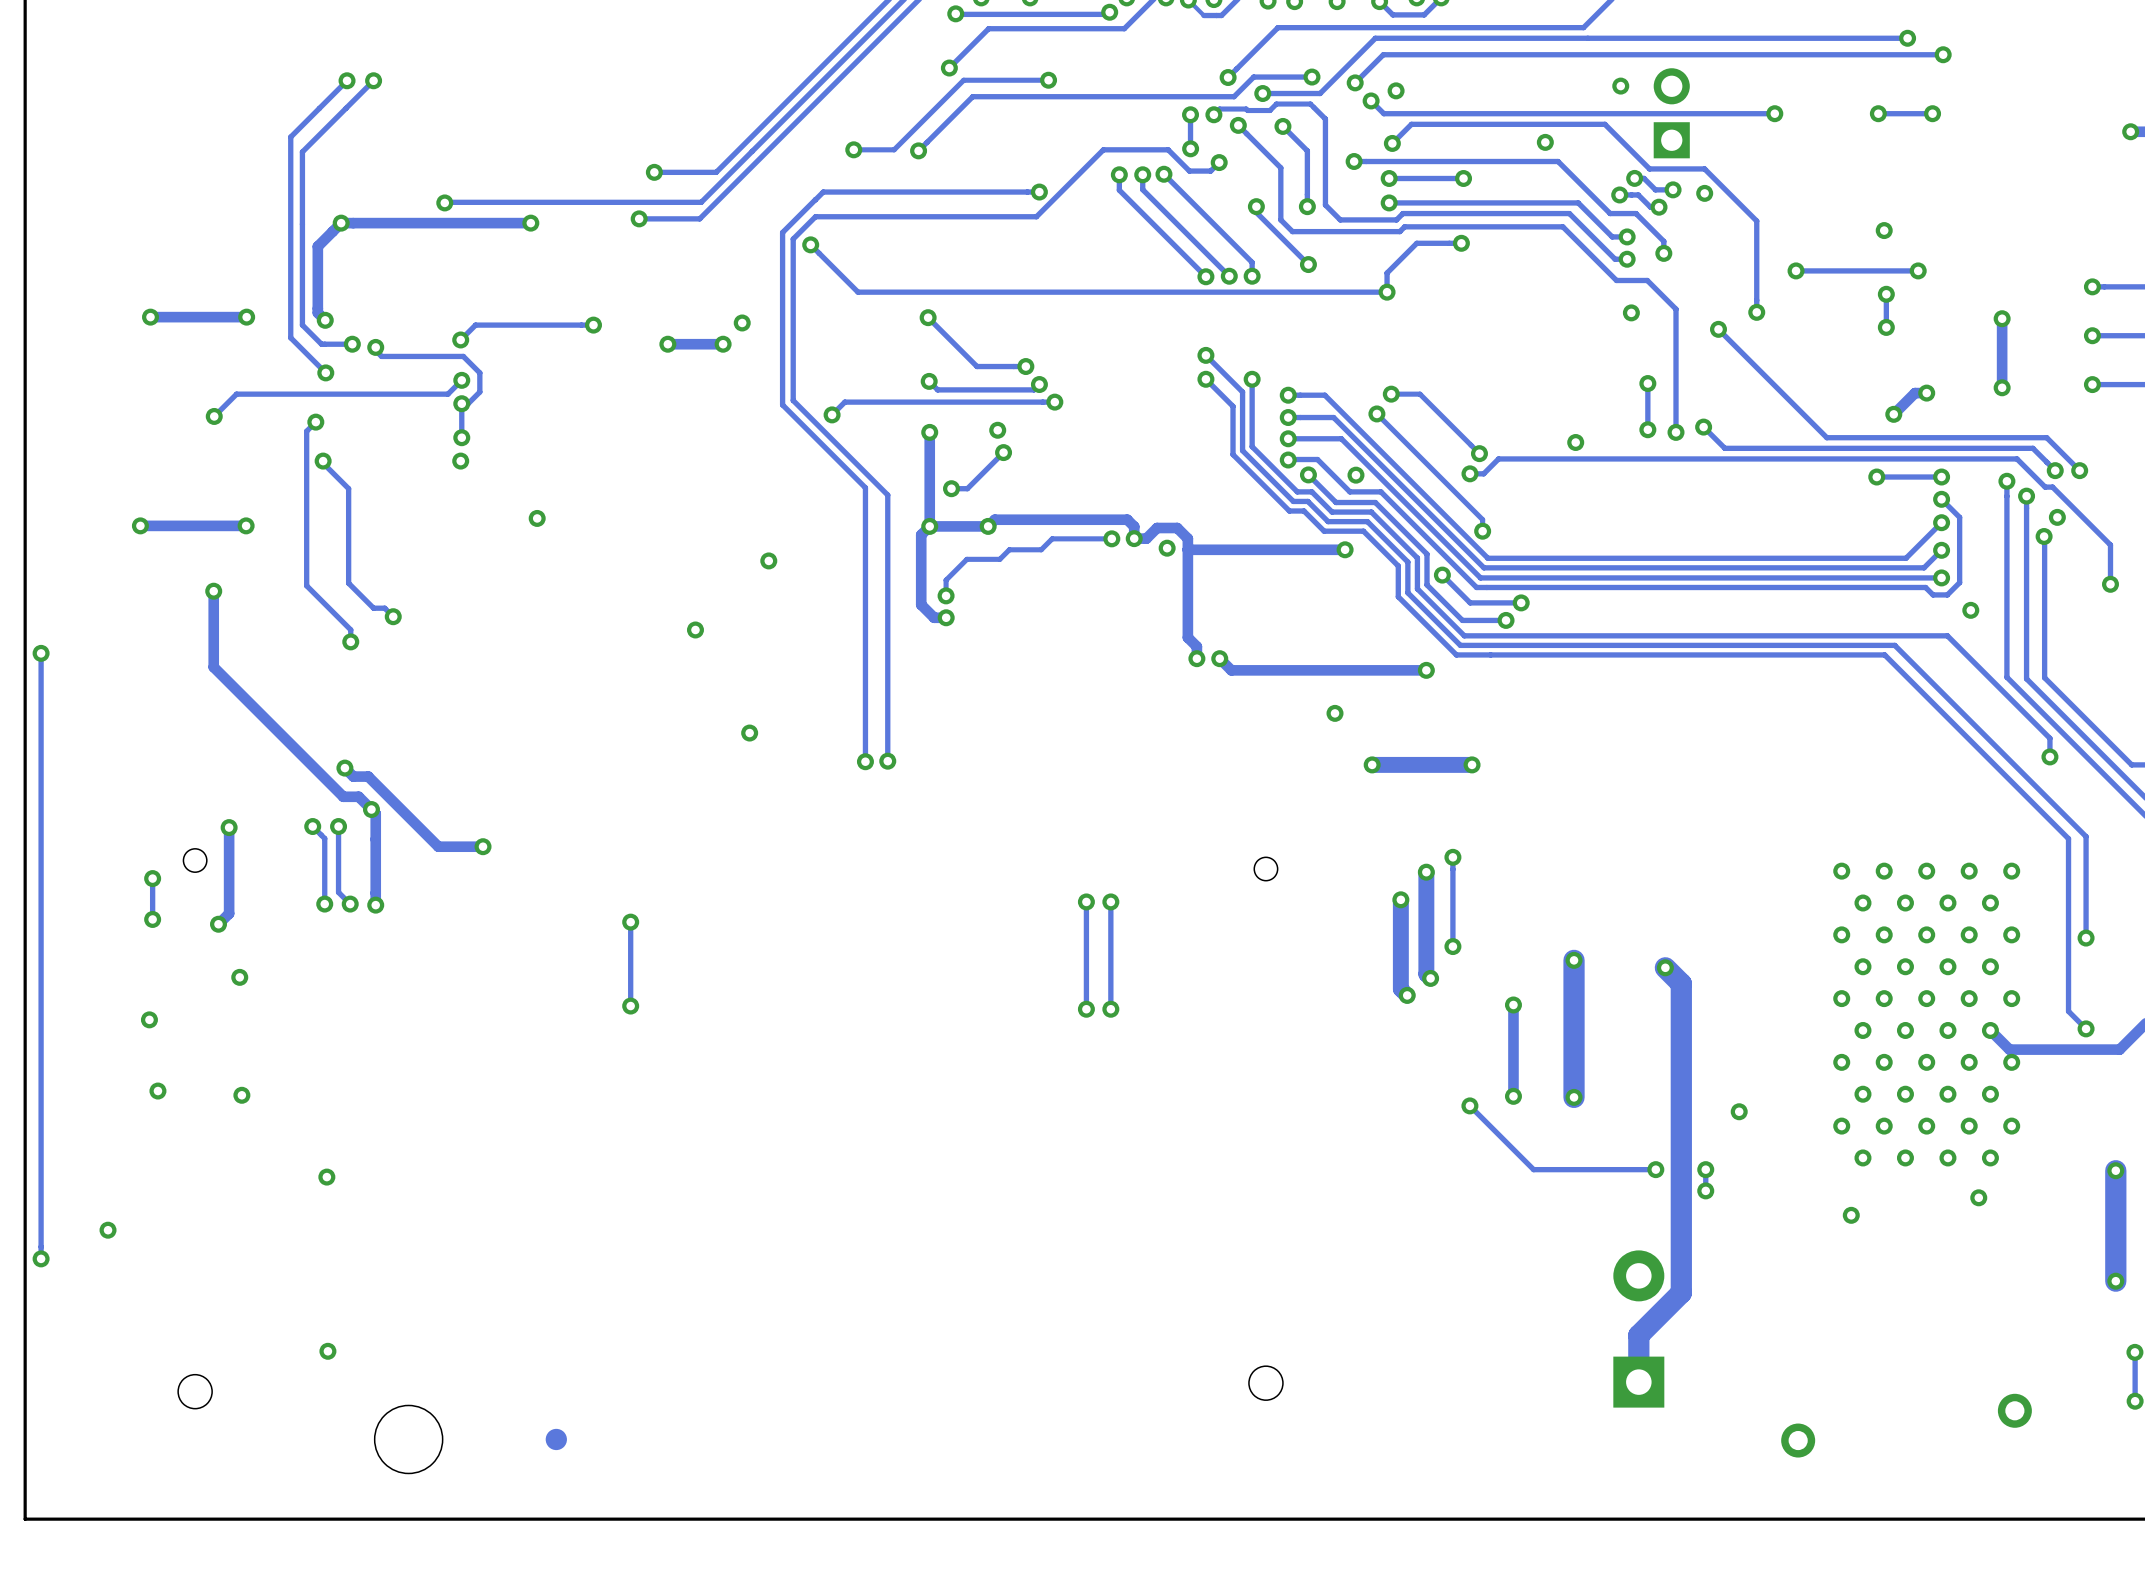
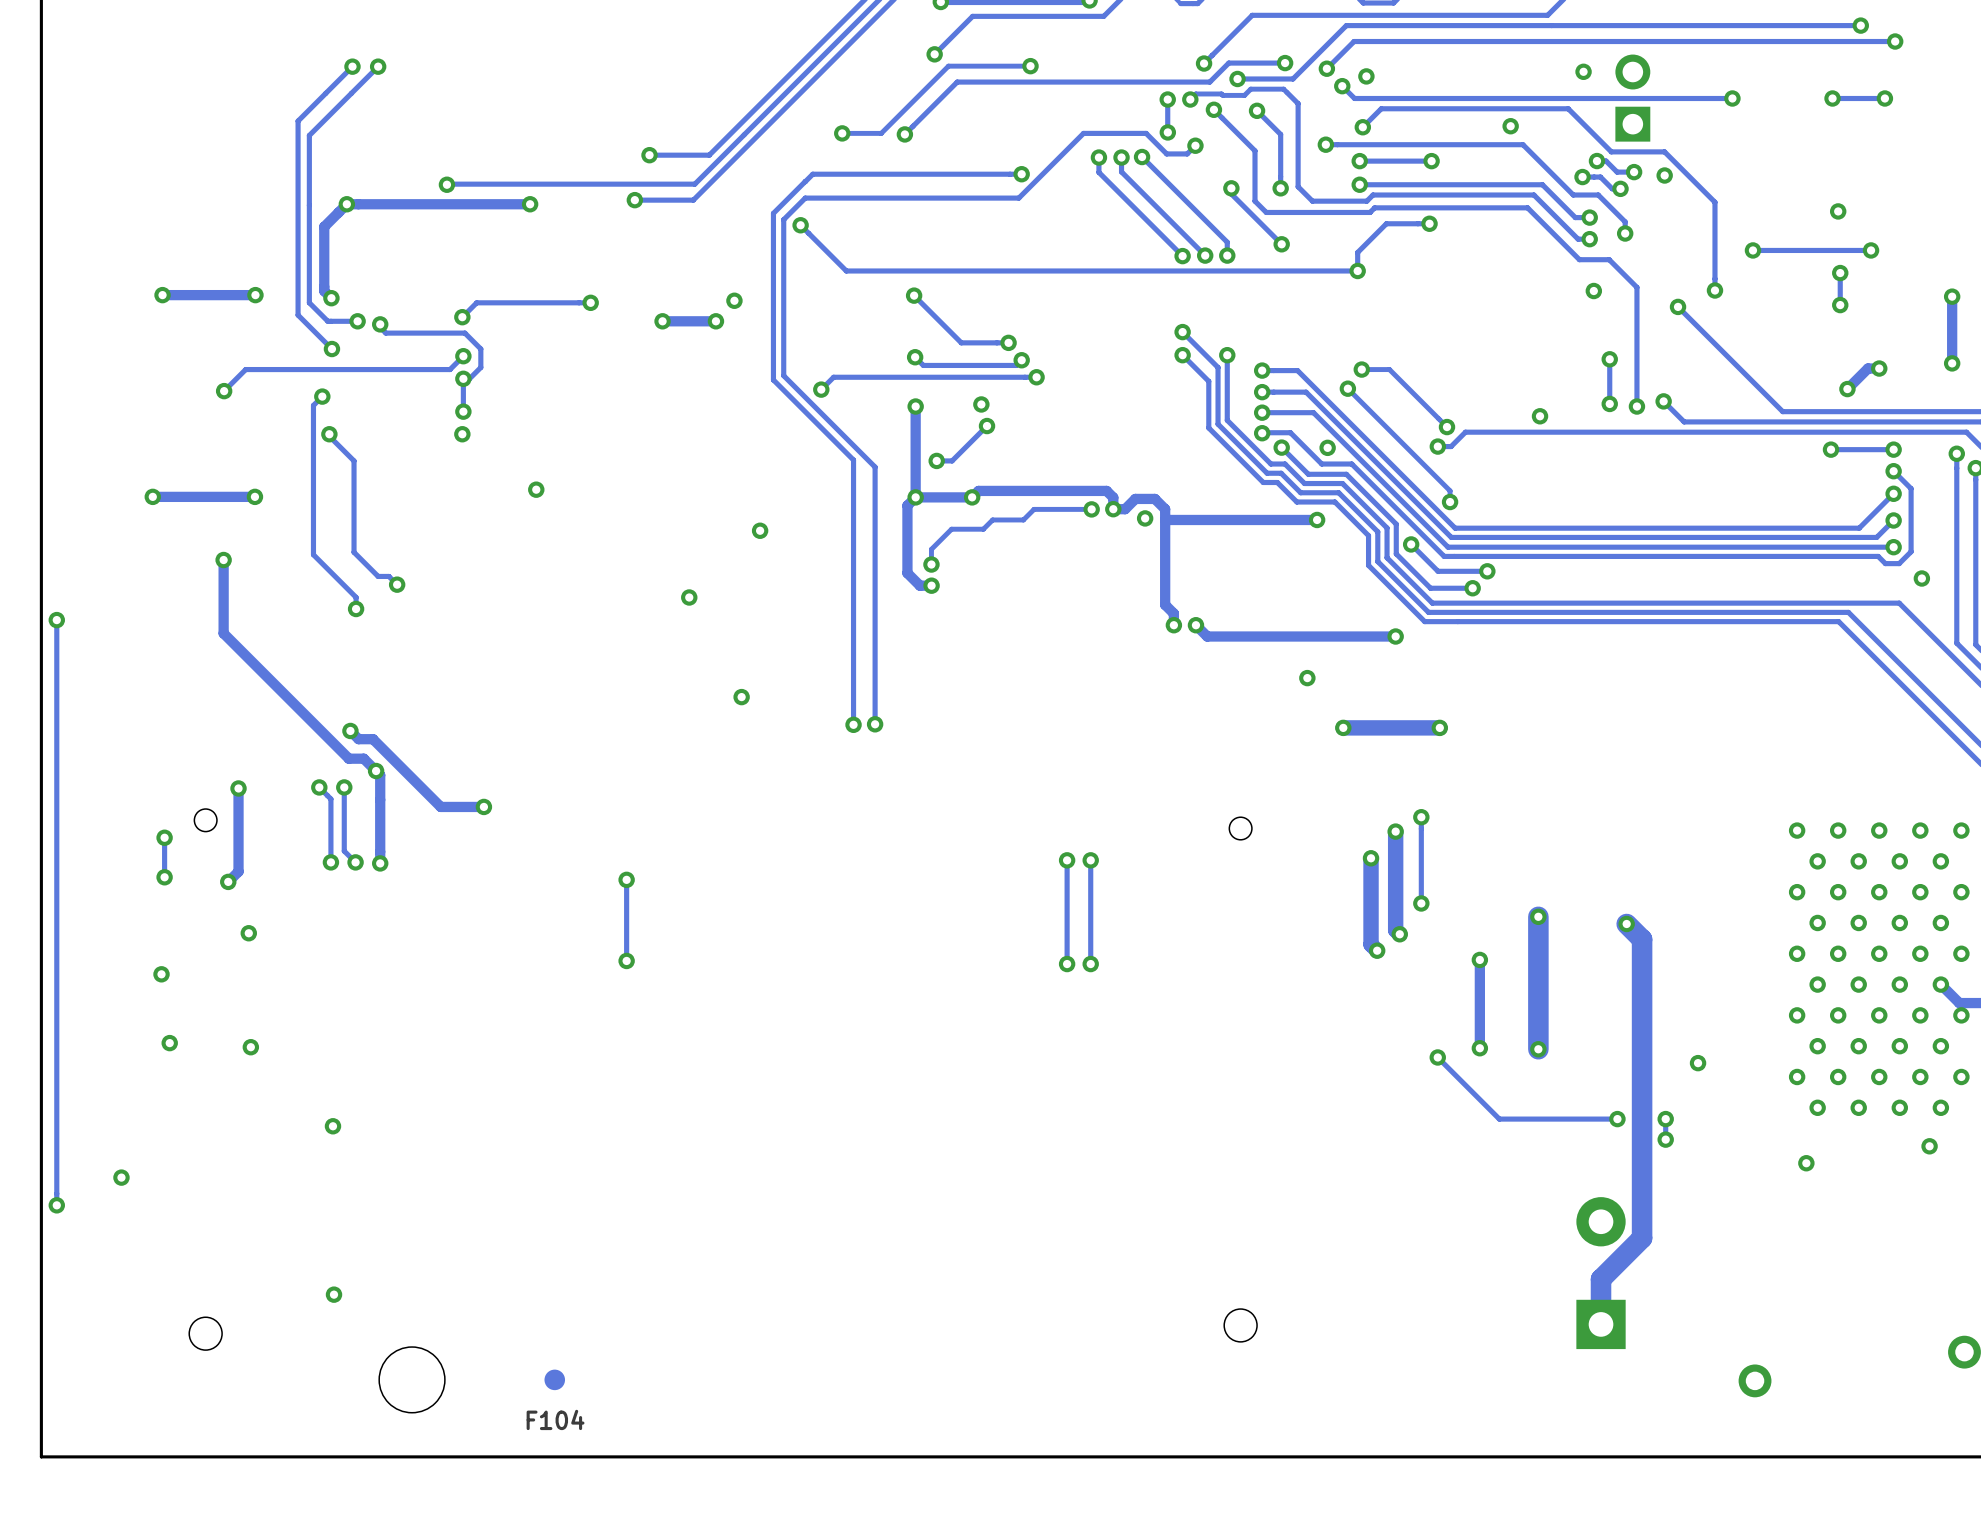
F104 name: none -> F104 (555, 1419)

